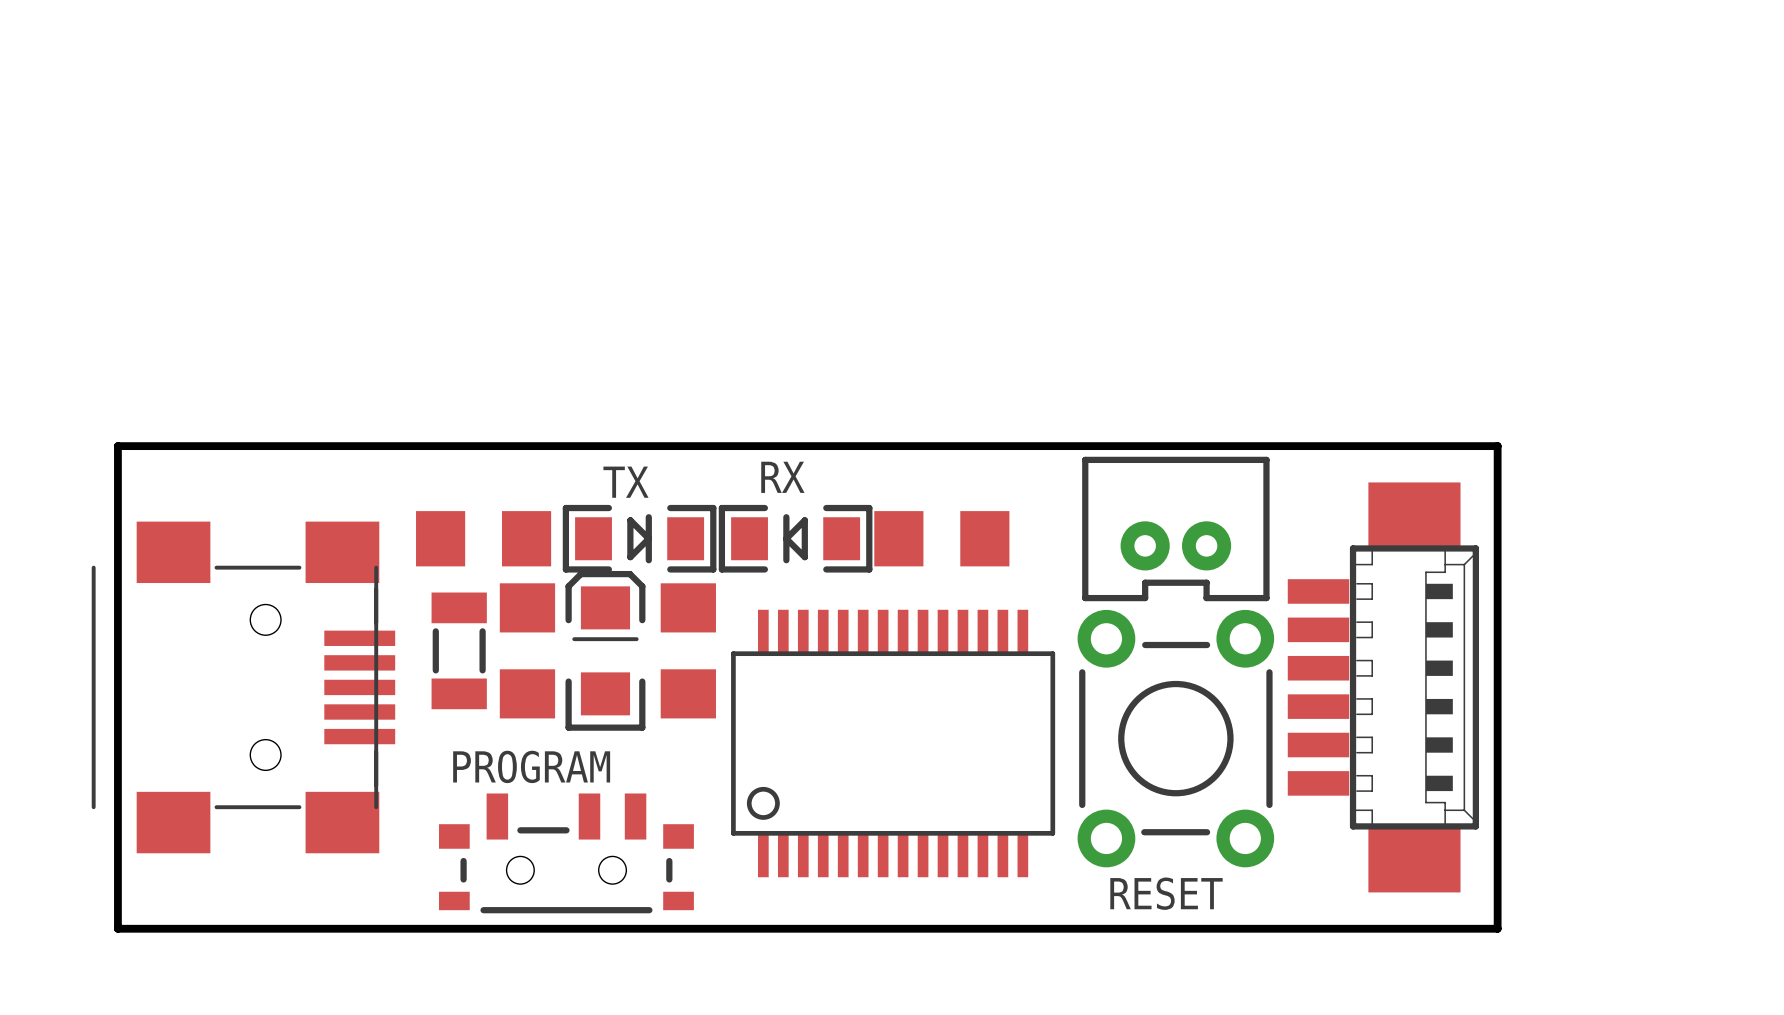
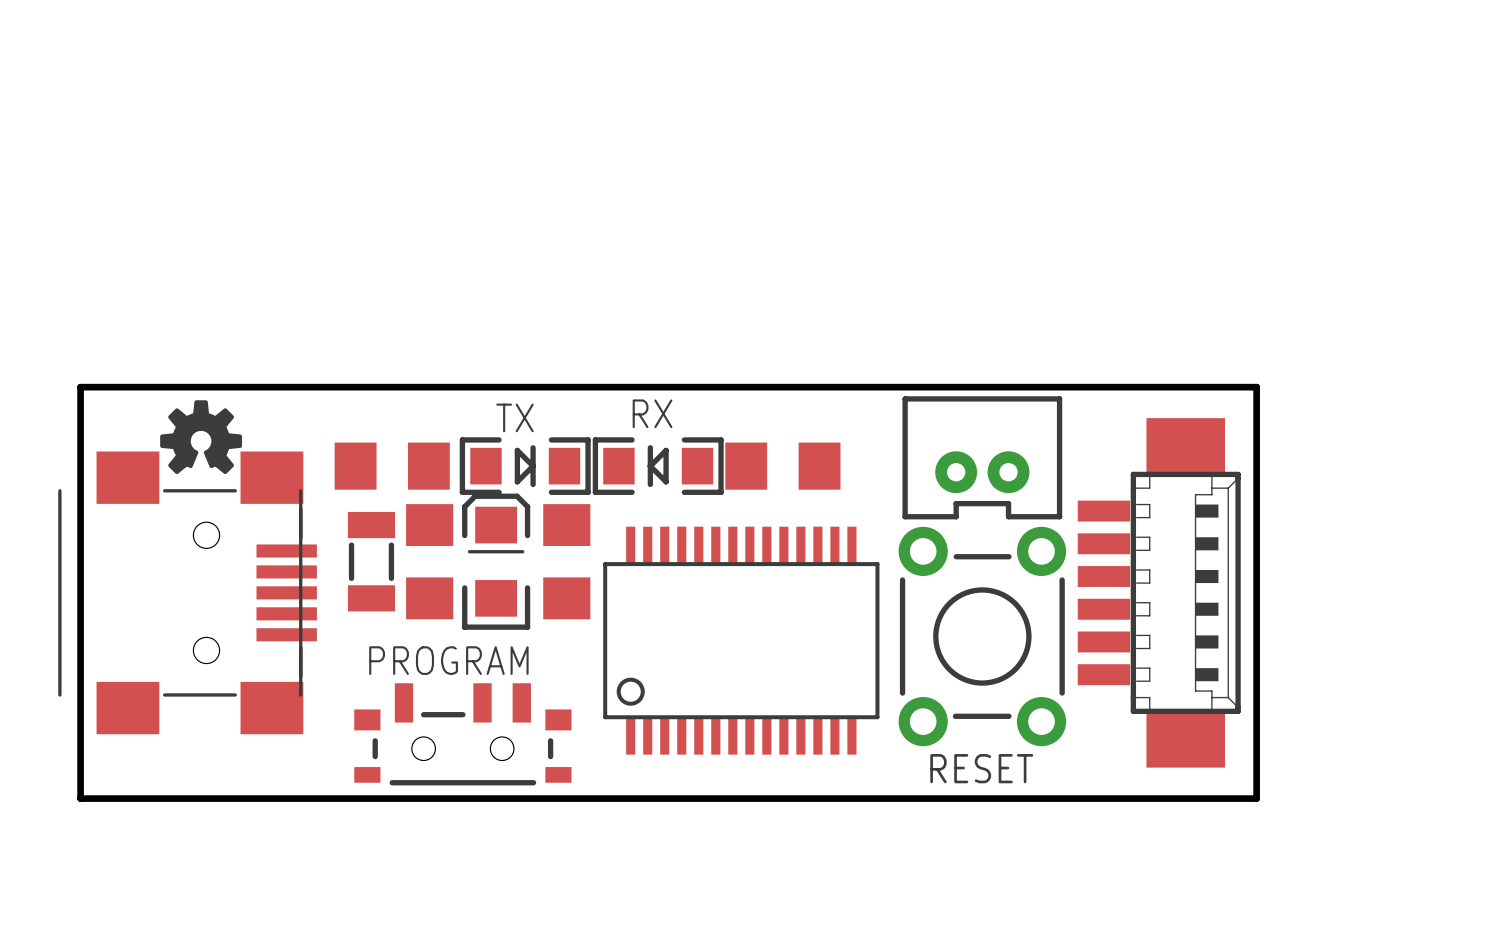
drawing: none -> [160, 400, 243, 475]

